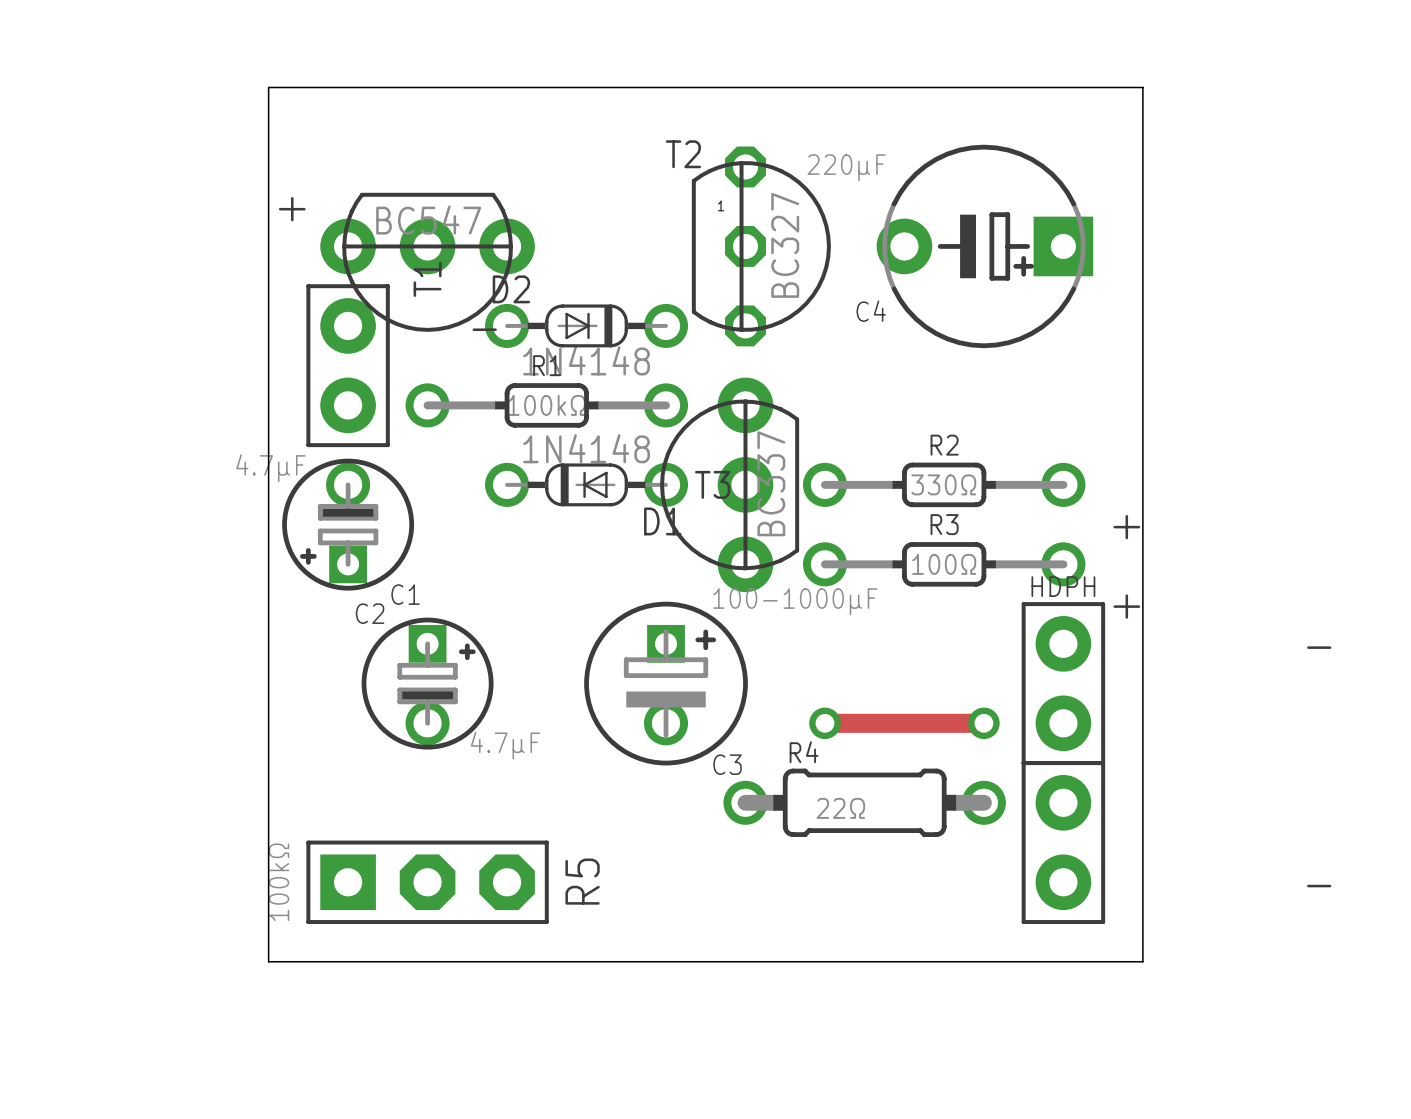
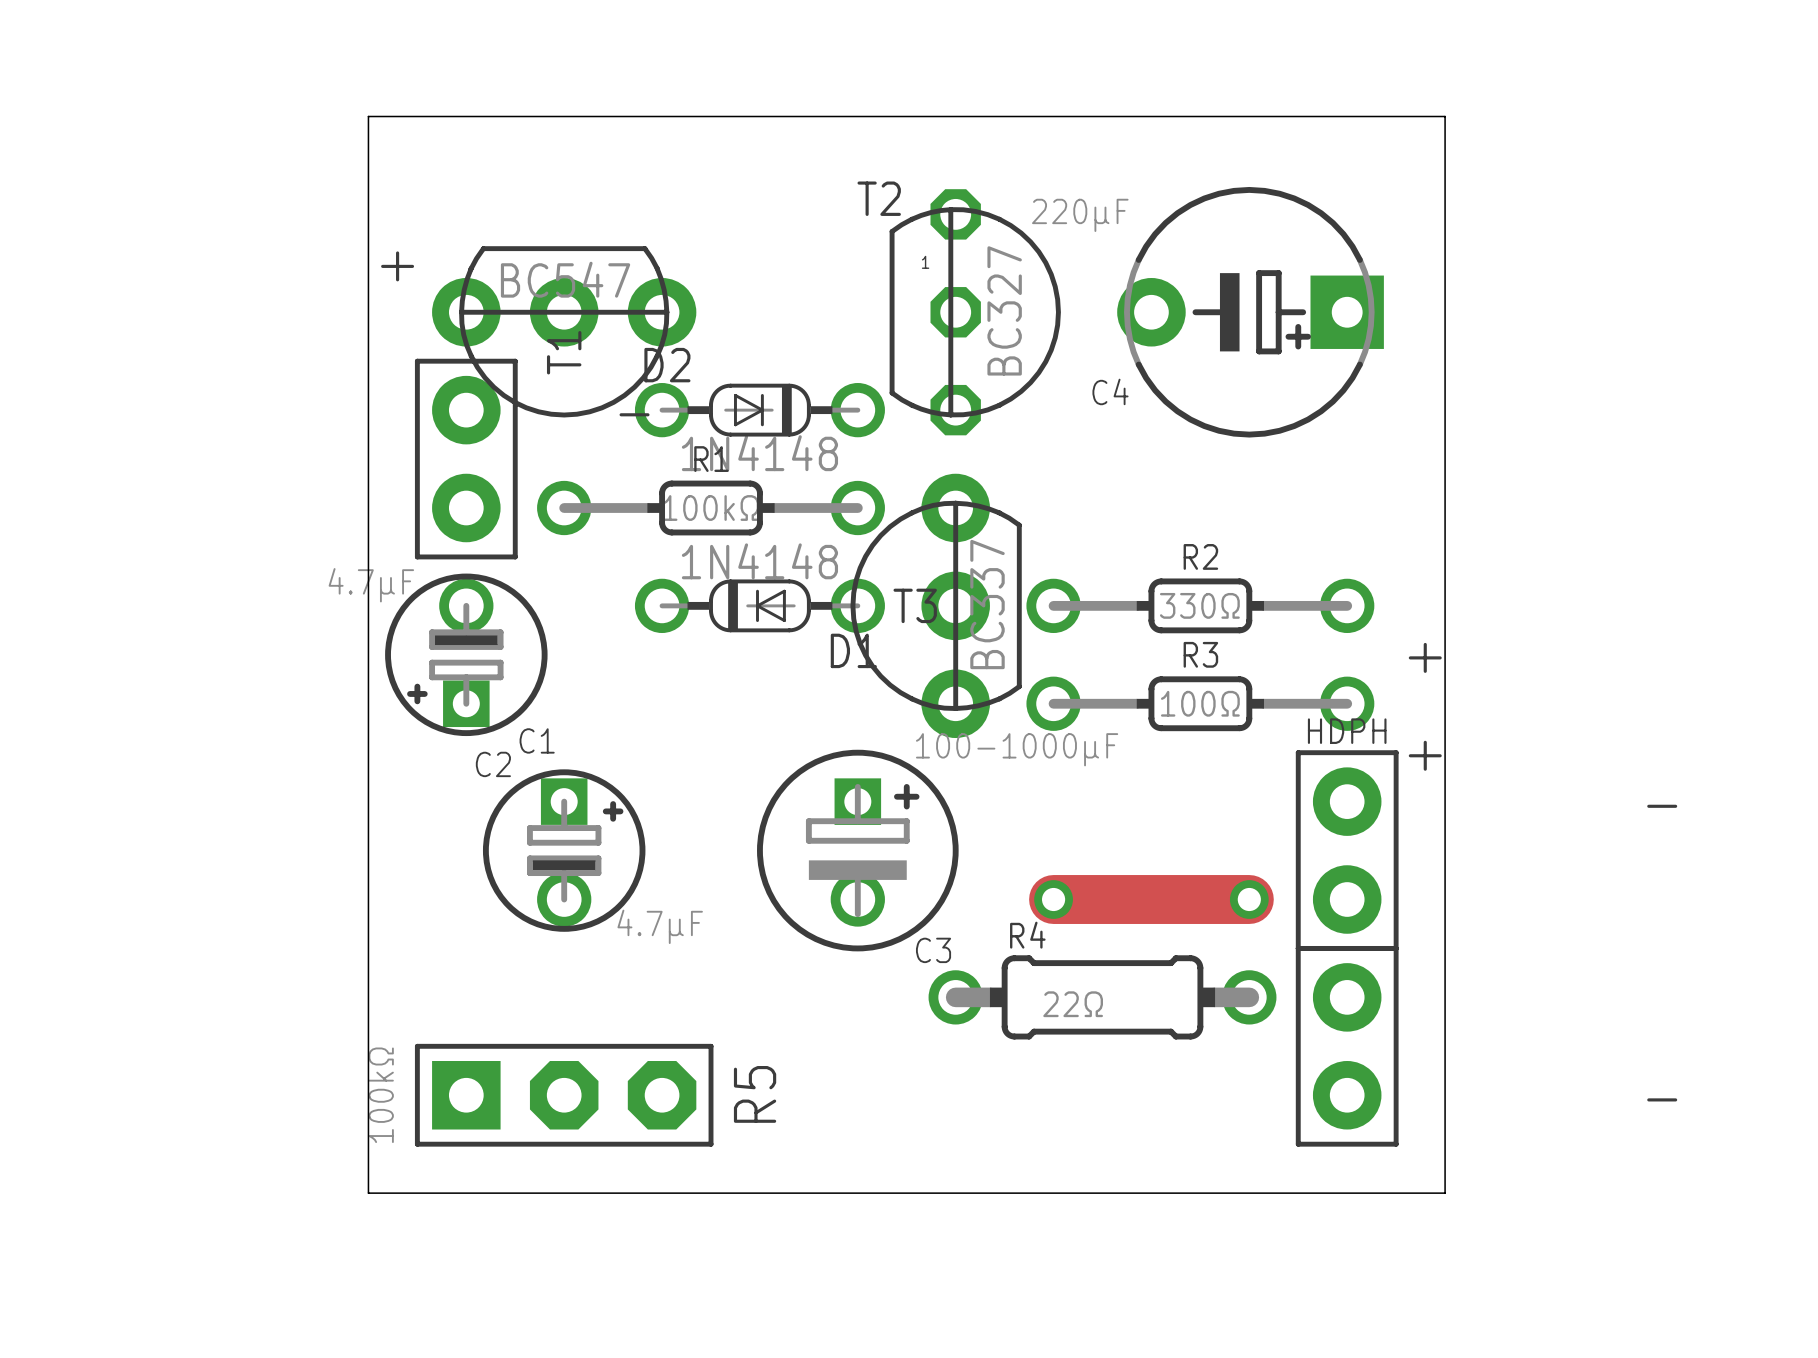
track width: thin (824, 723) (983, 723) -> thick (1053, 899) (1249, 899)

